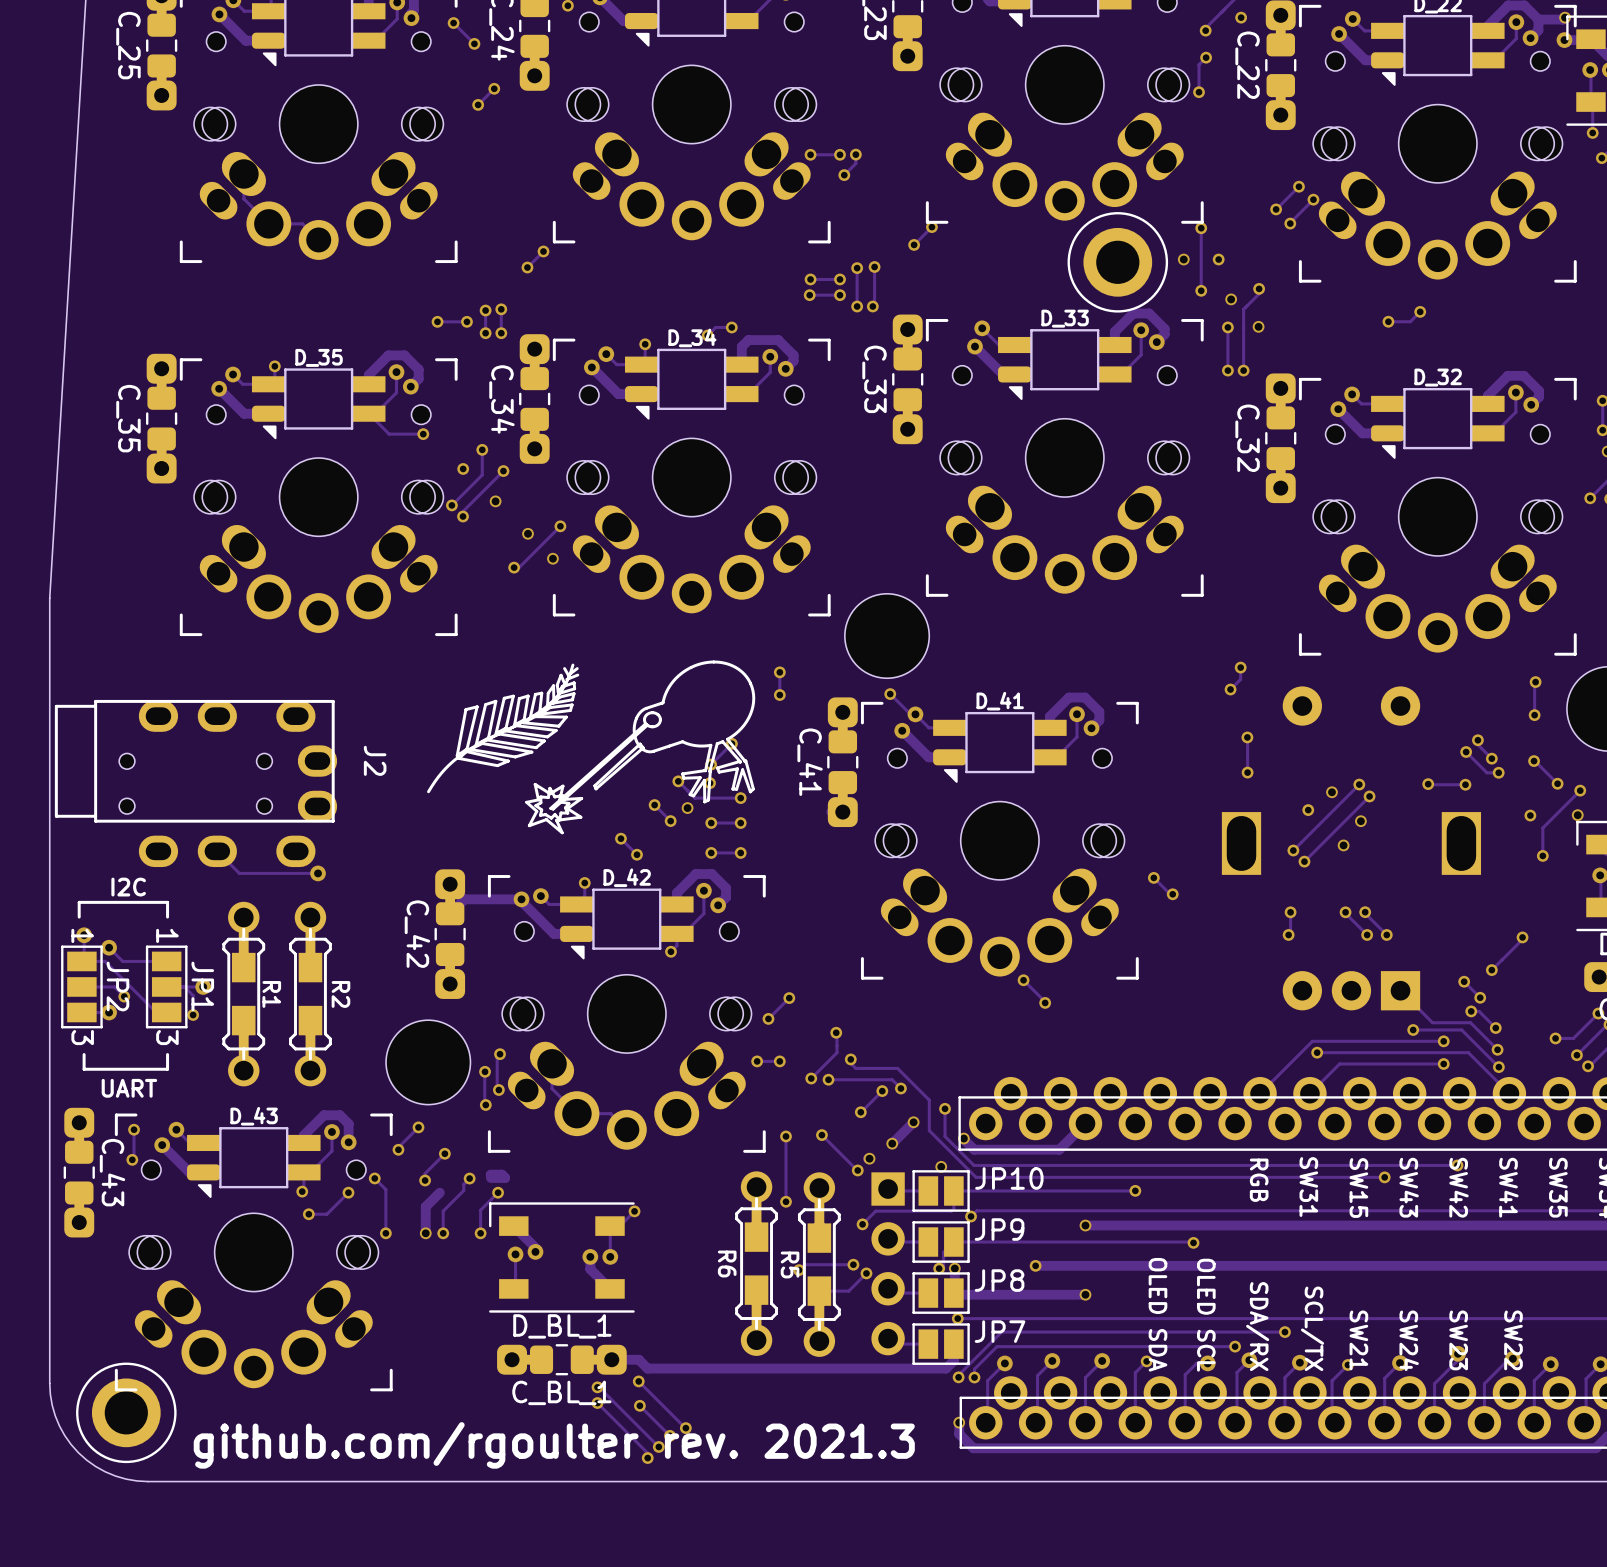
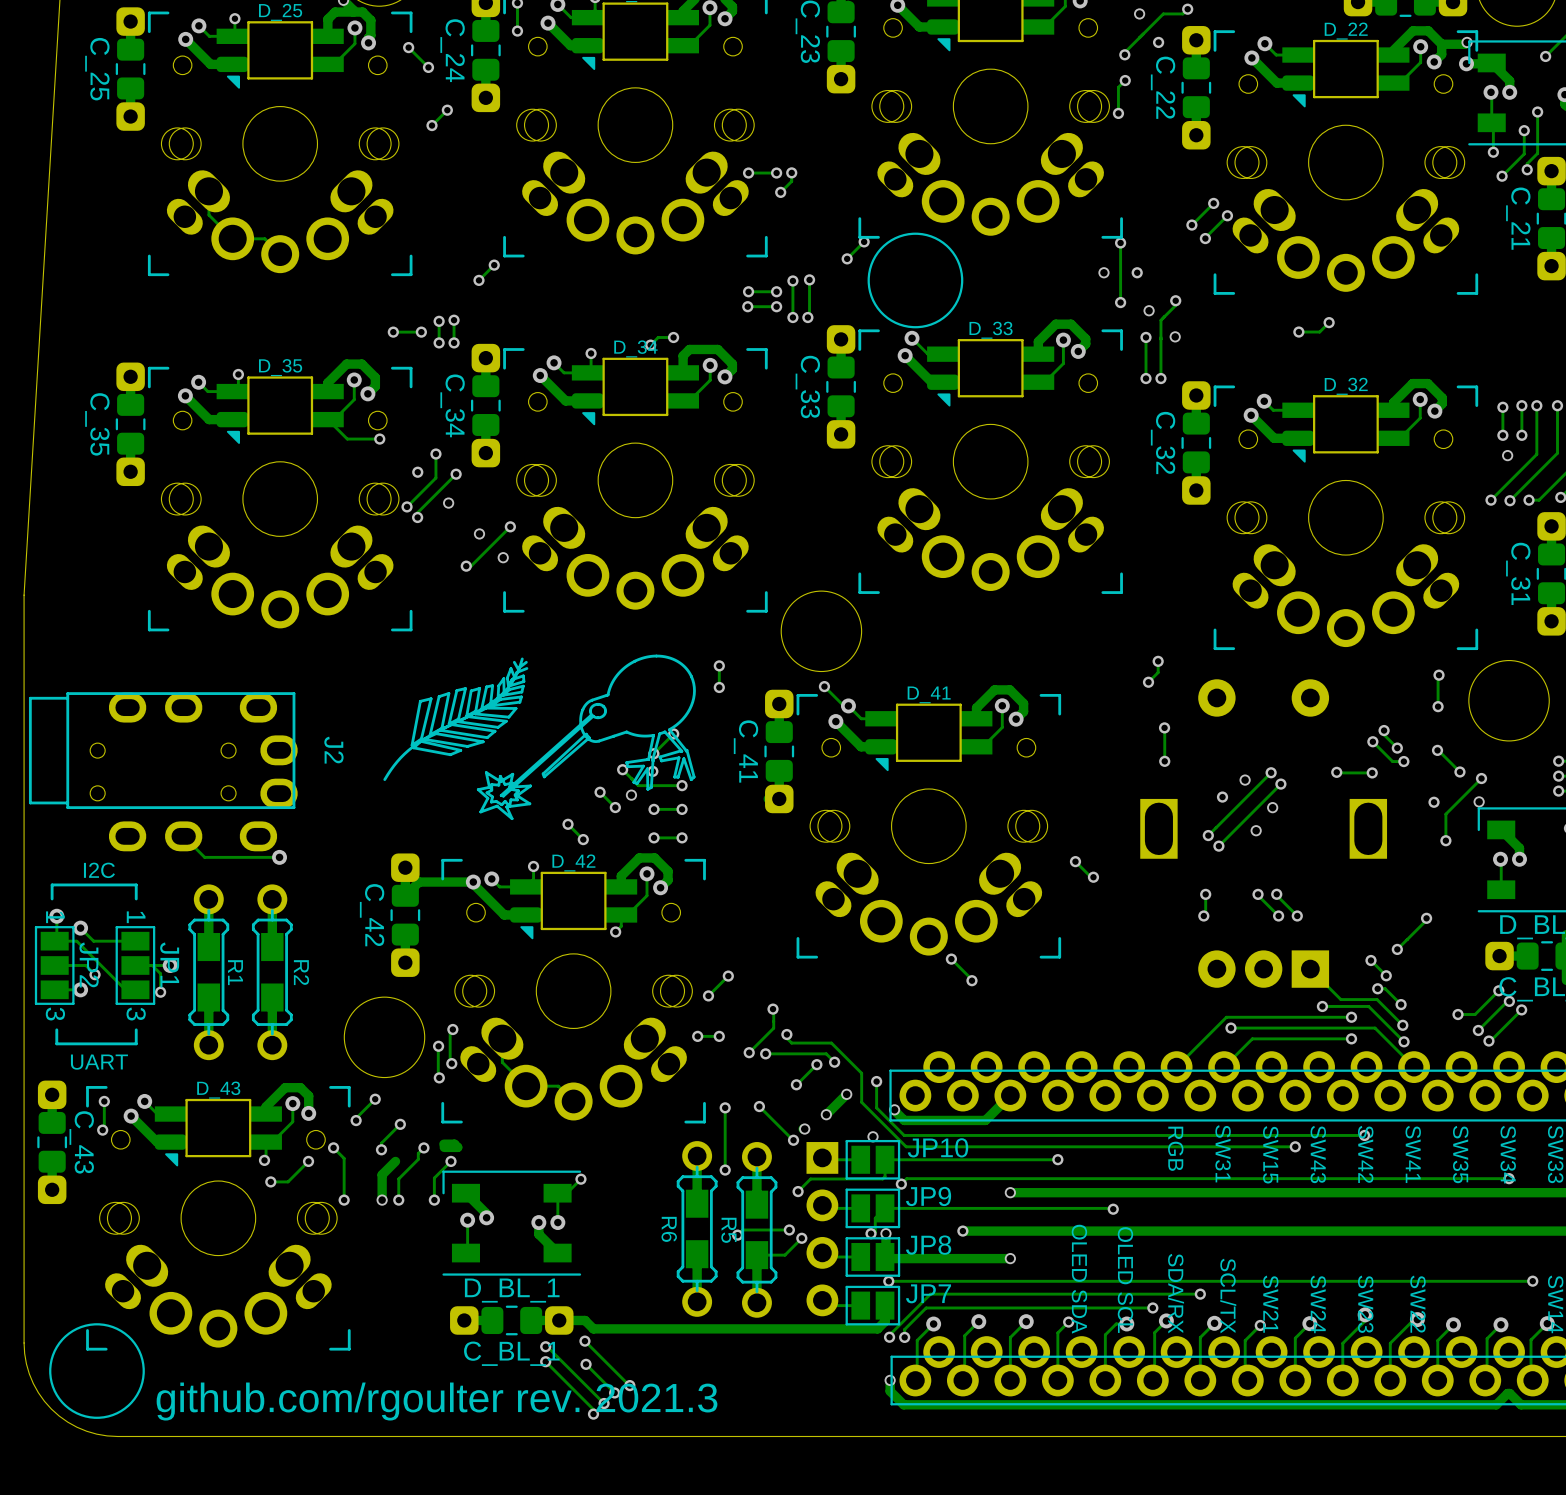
part: (1117, 262) -> none
drawing position: (1117, 262) -> (915, 280)
part: (126, 1412) -> none

